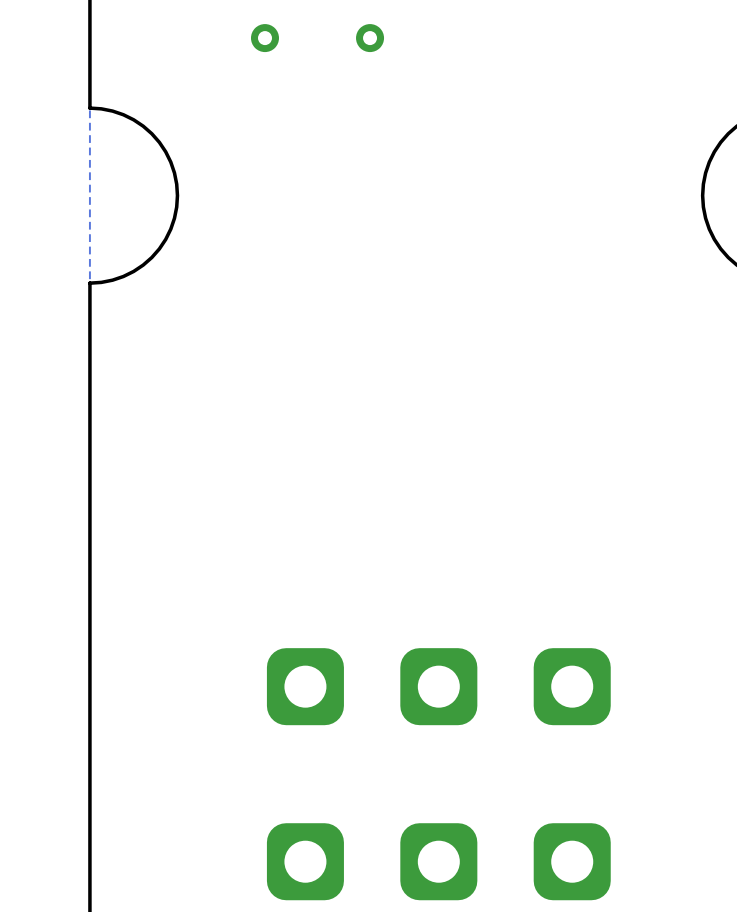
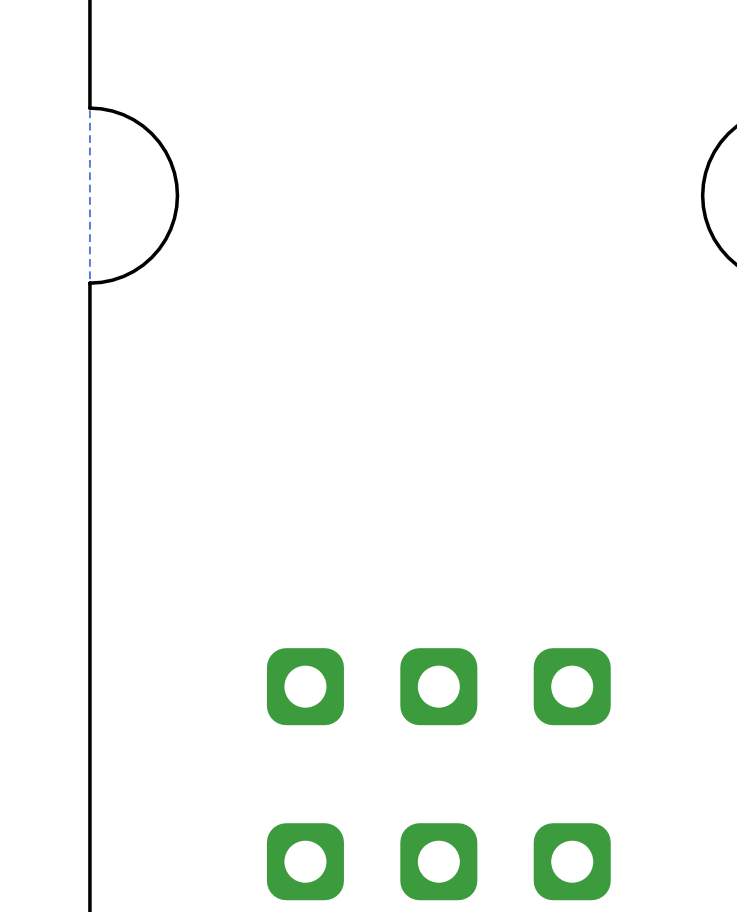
via: (264, 38) -> none
via: (370, 38) -> none

